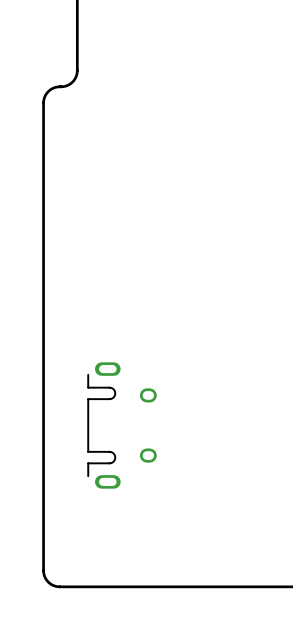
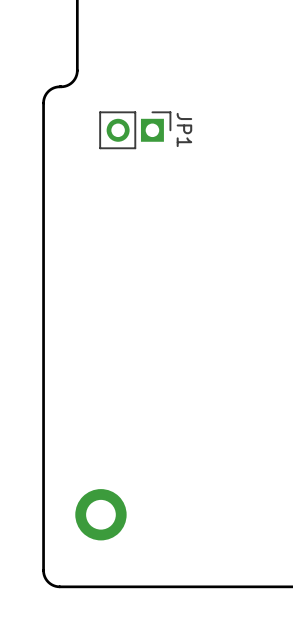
JP1: none -> (135, 130)
part: (122, 425) -> none
part: none -> (100, 514)

